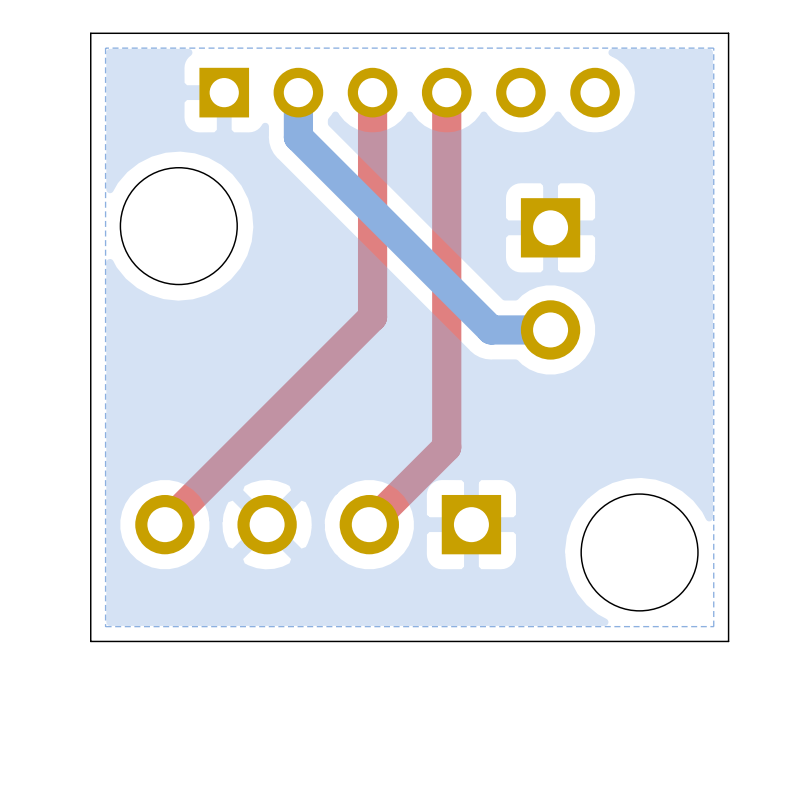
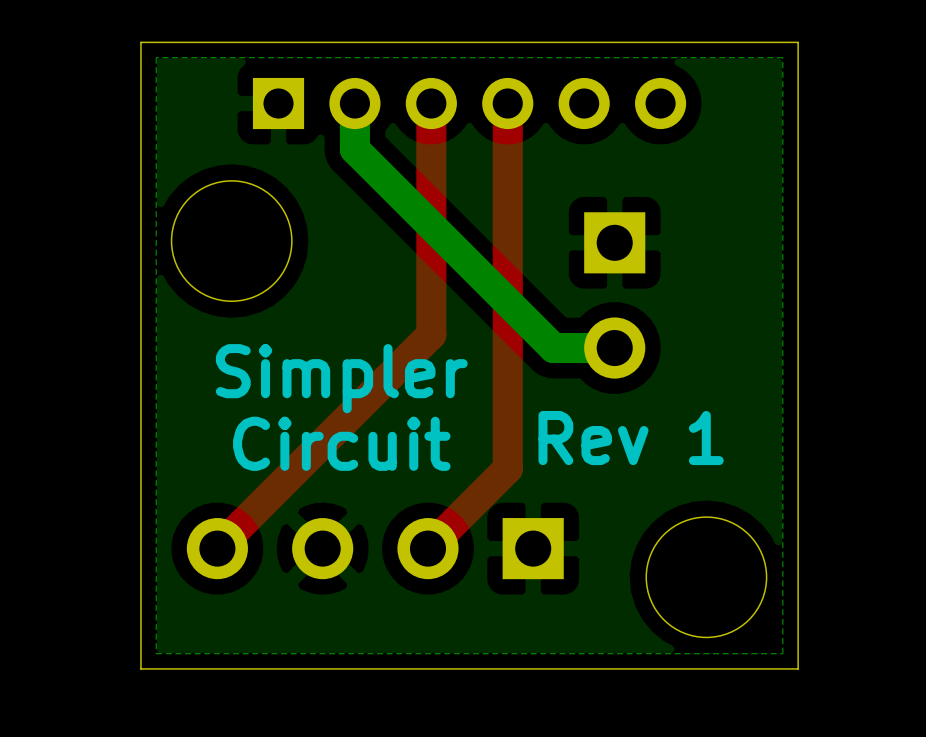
text: none -> Simpler (341, 378)
text: none -> Rev 1 (631, 438)
text: none -> Circuit (341, 443)

